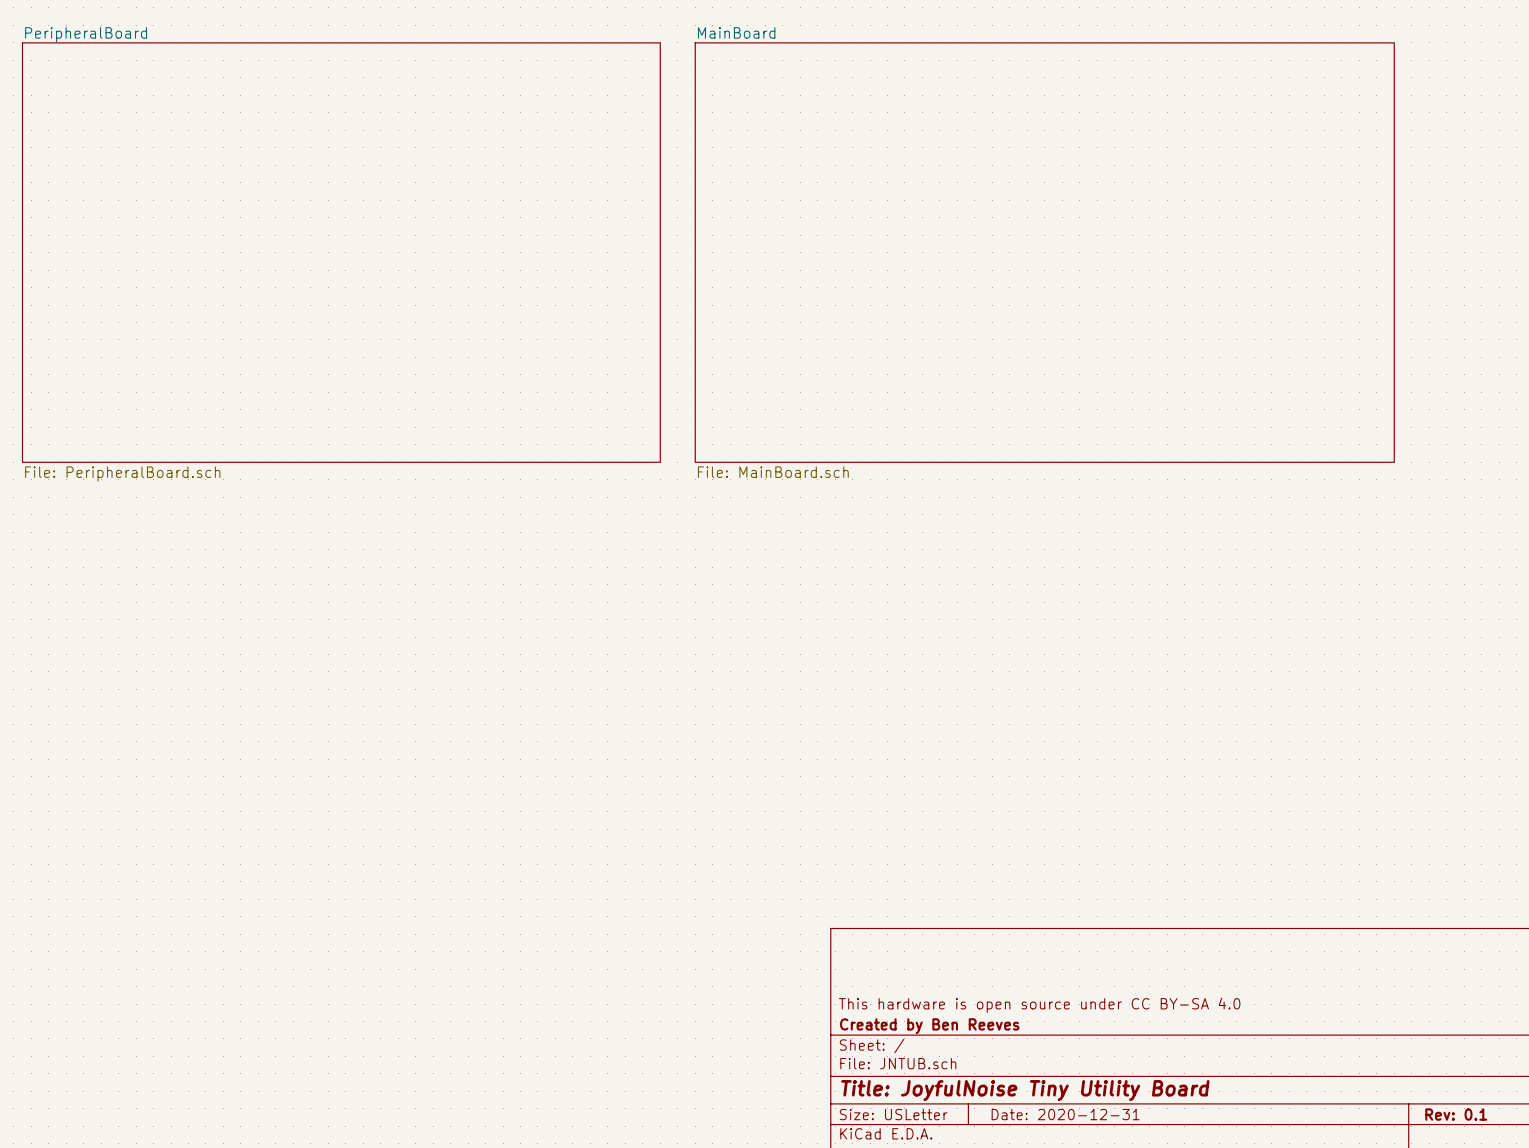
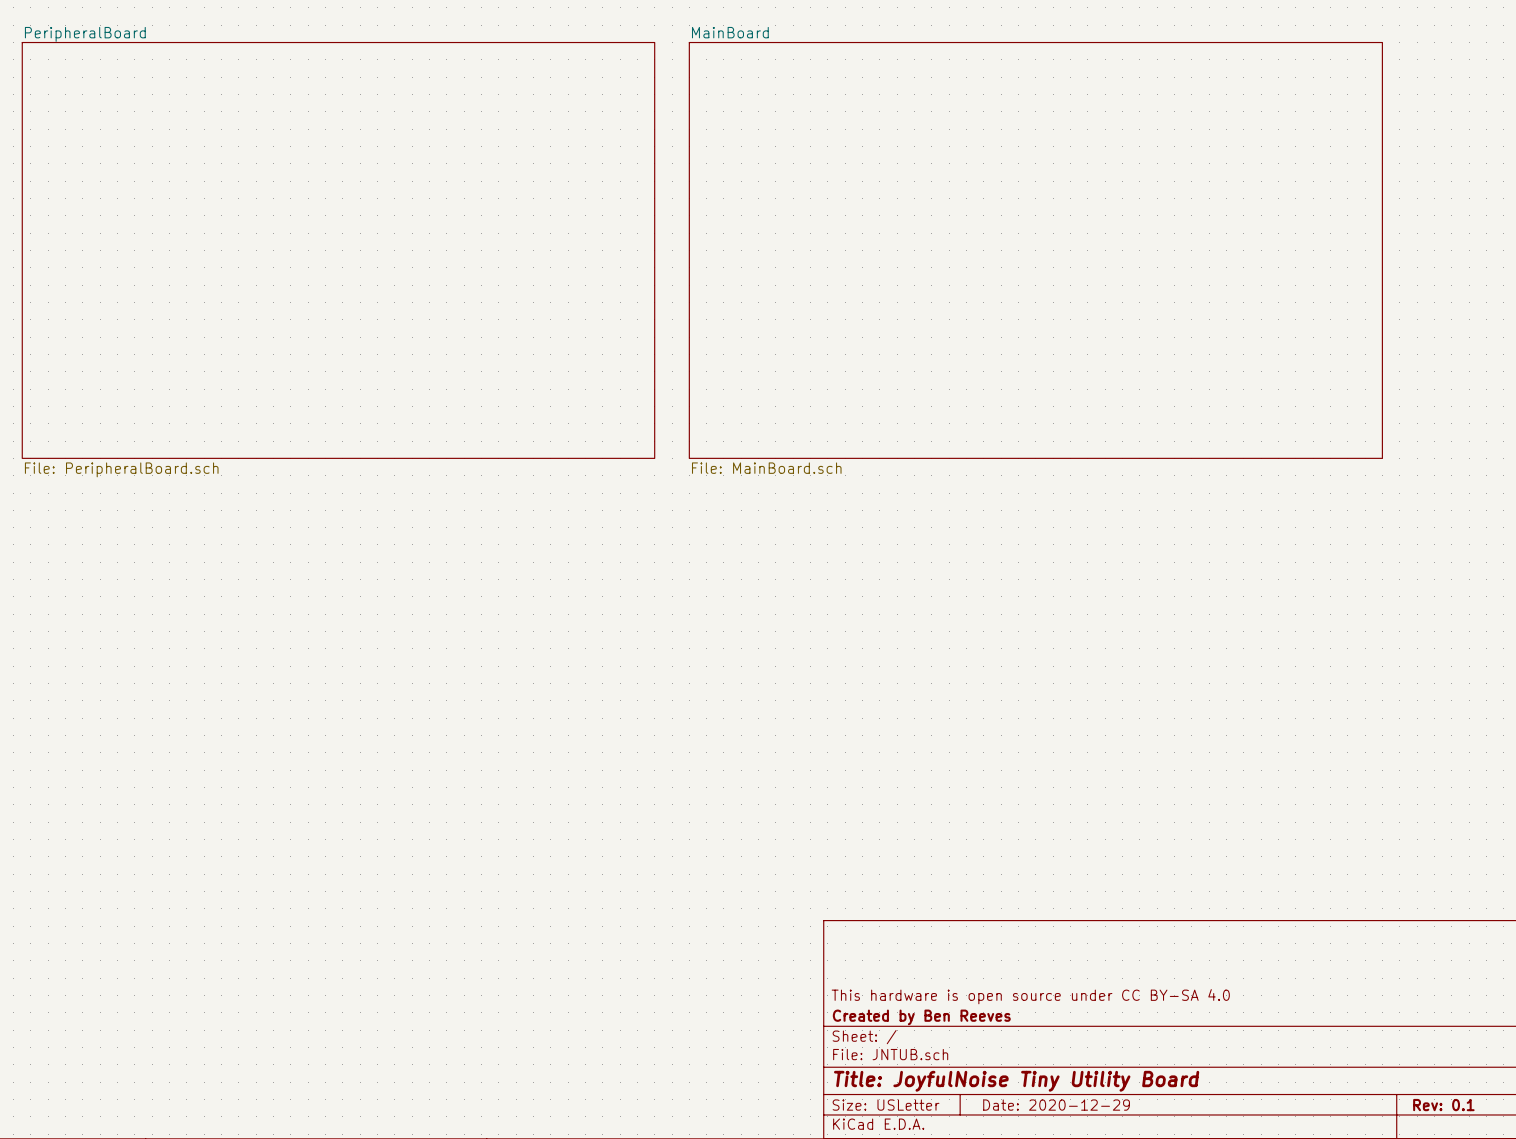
title block: Date: 2020-12-31 (1065, 1114) -> Date: 2020-12-29 (1056, 1105)

